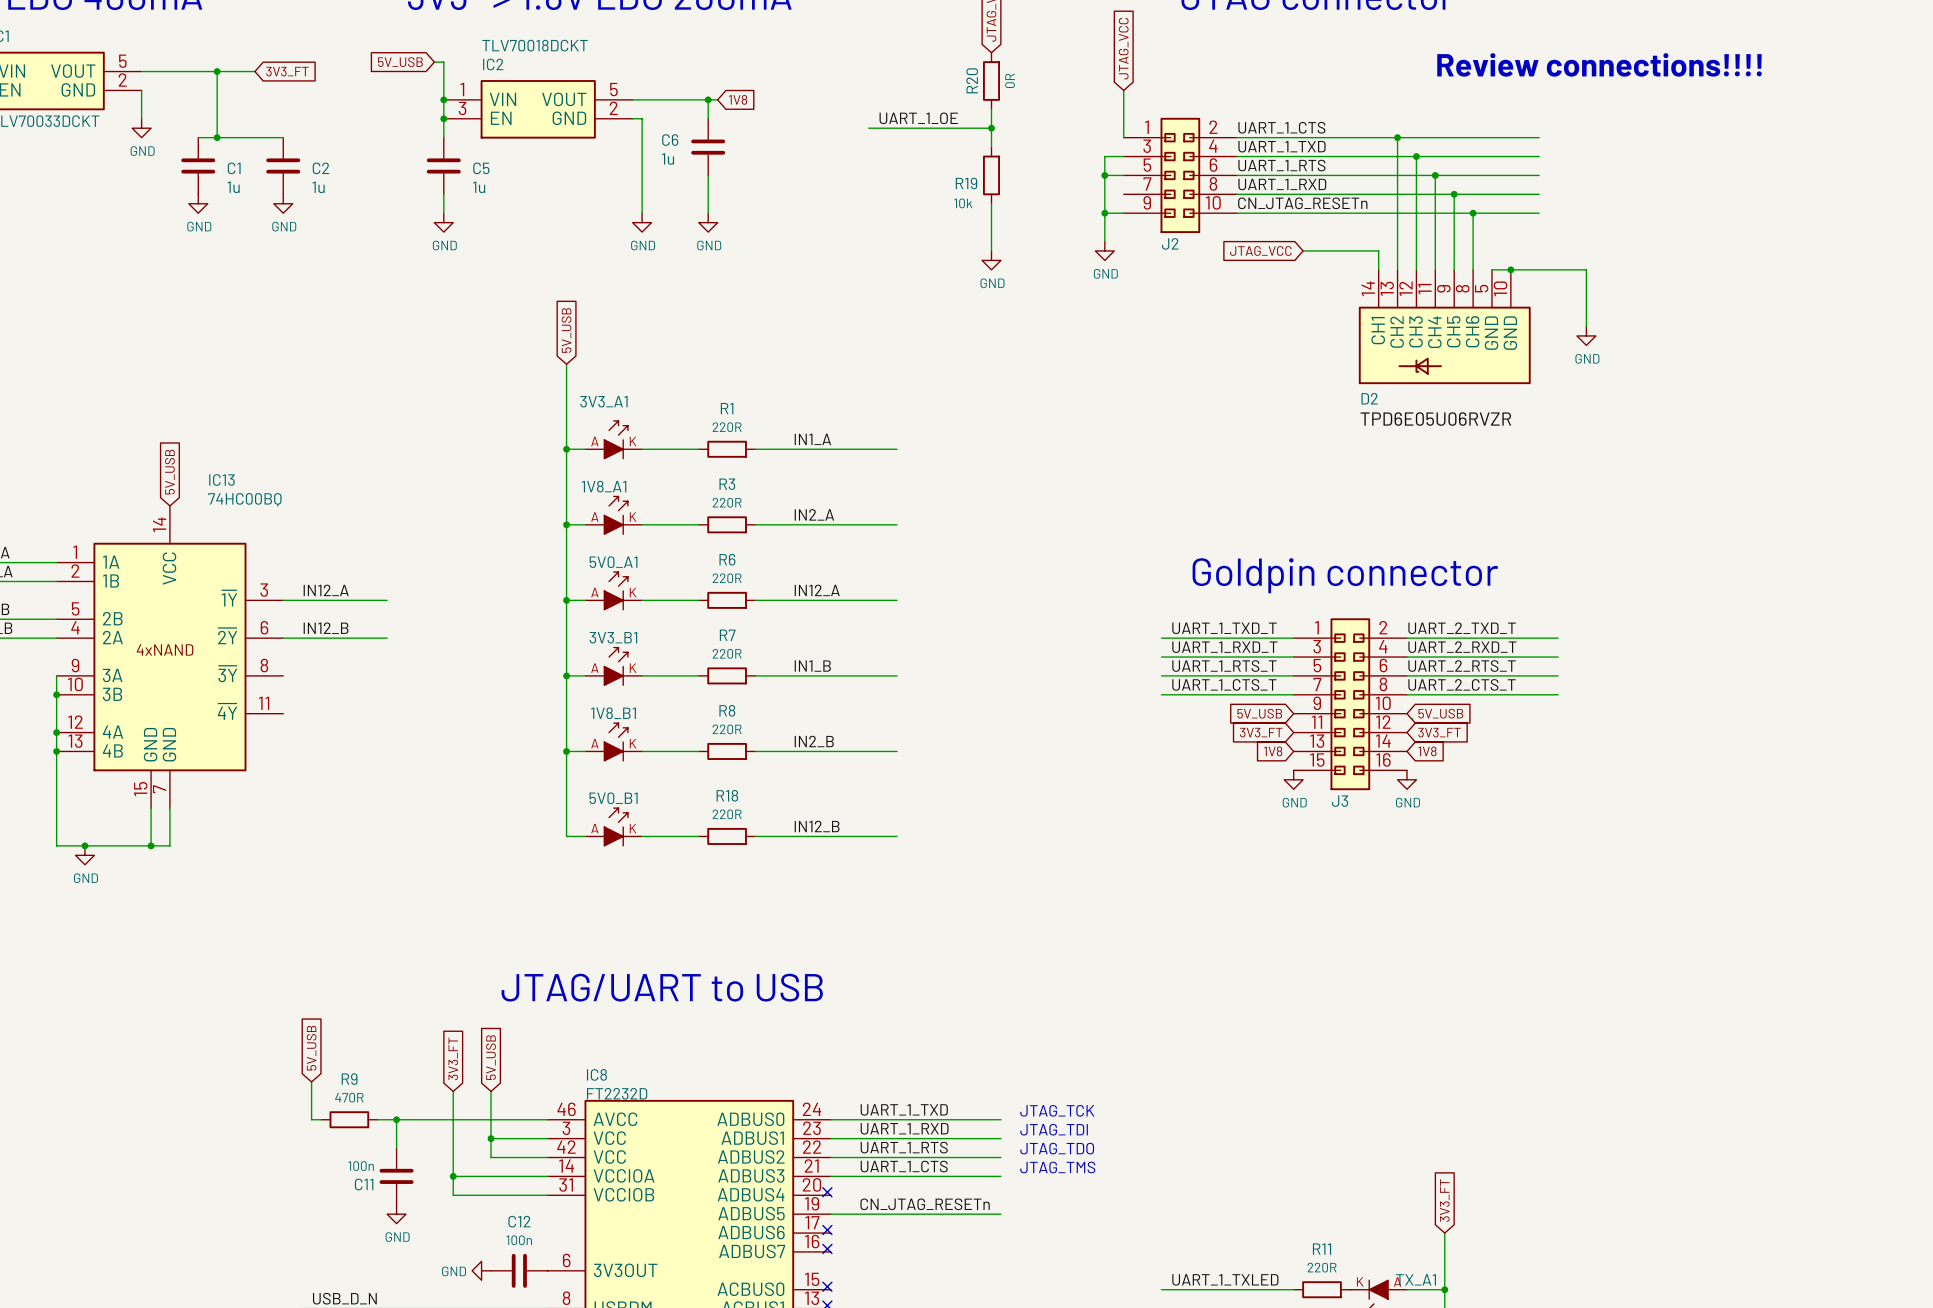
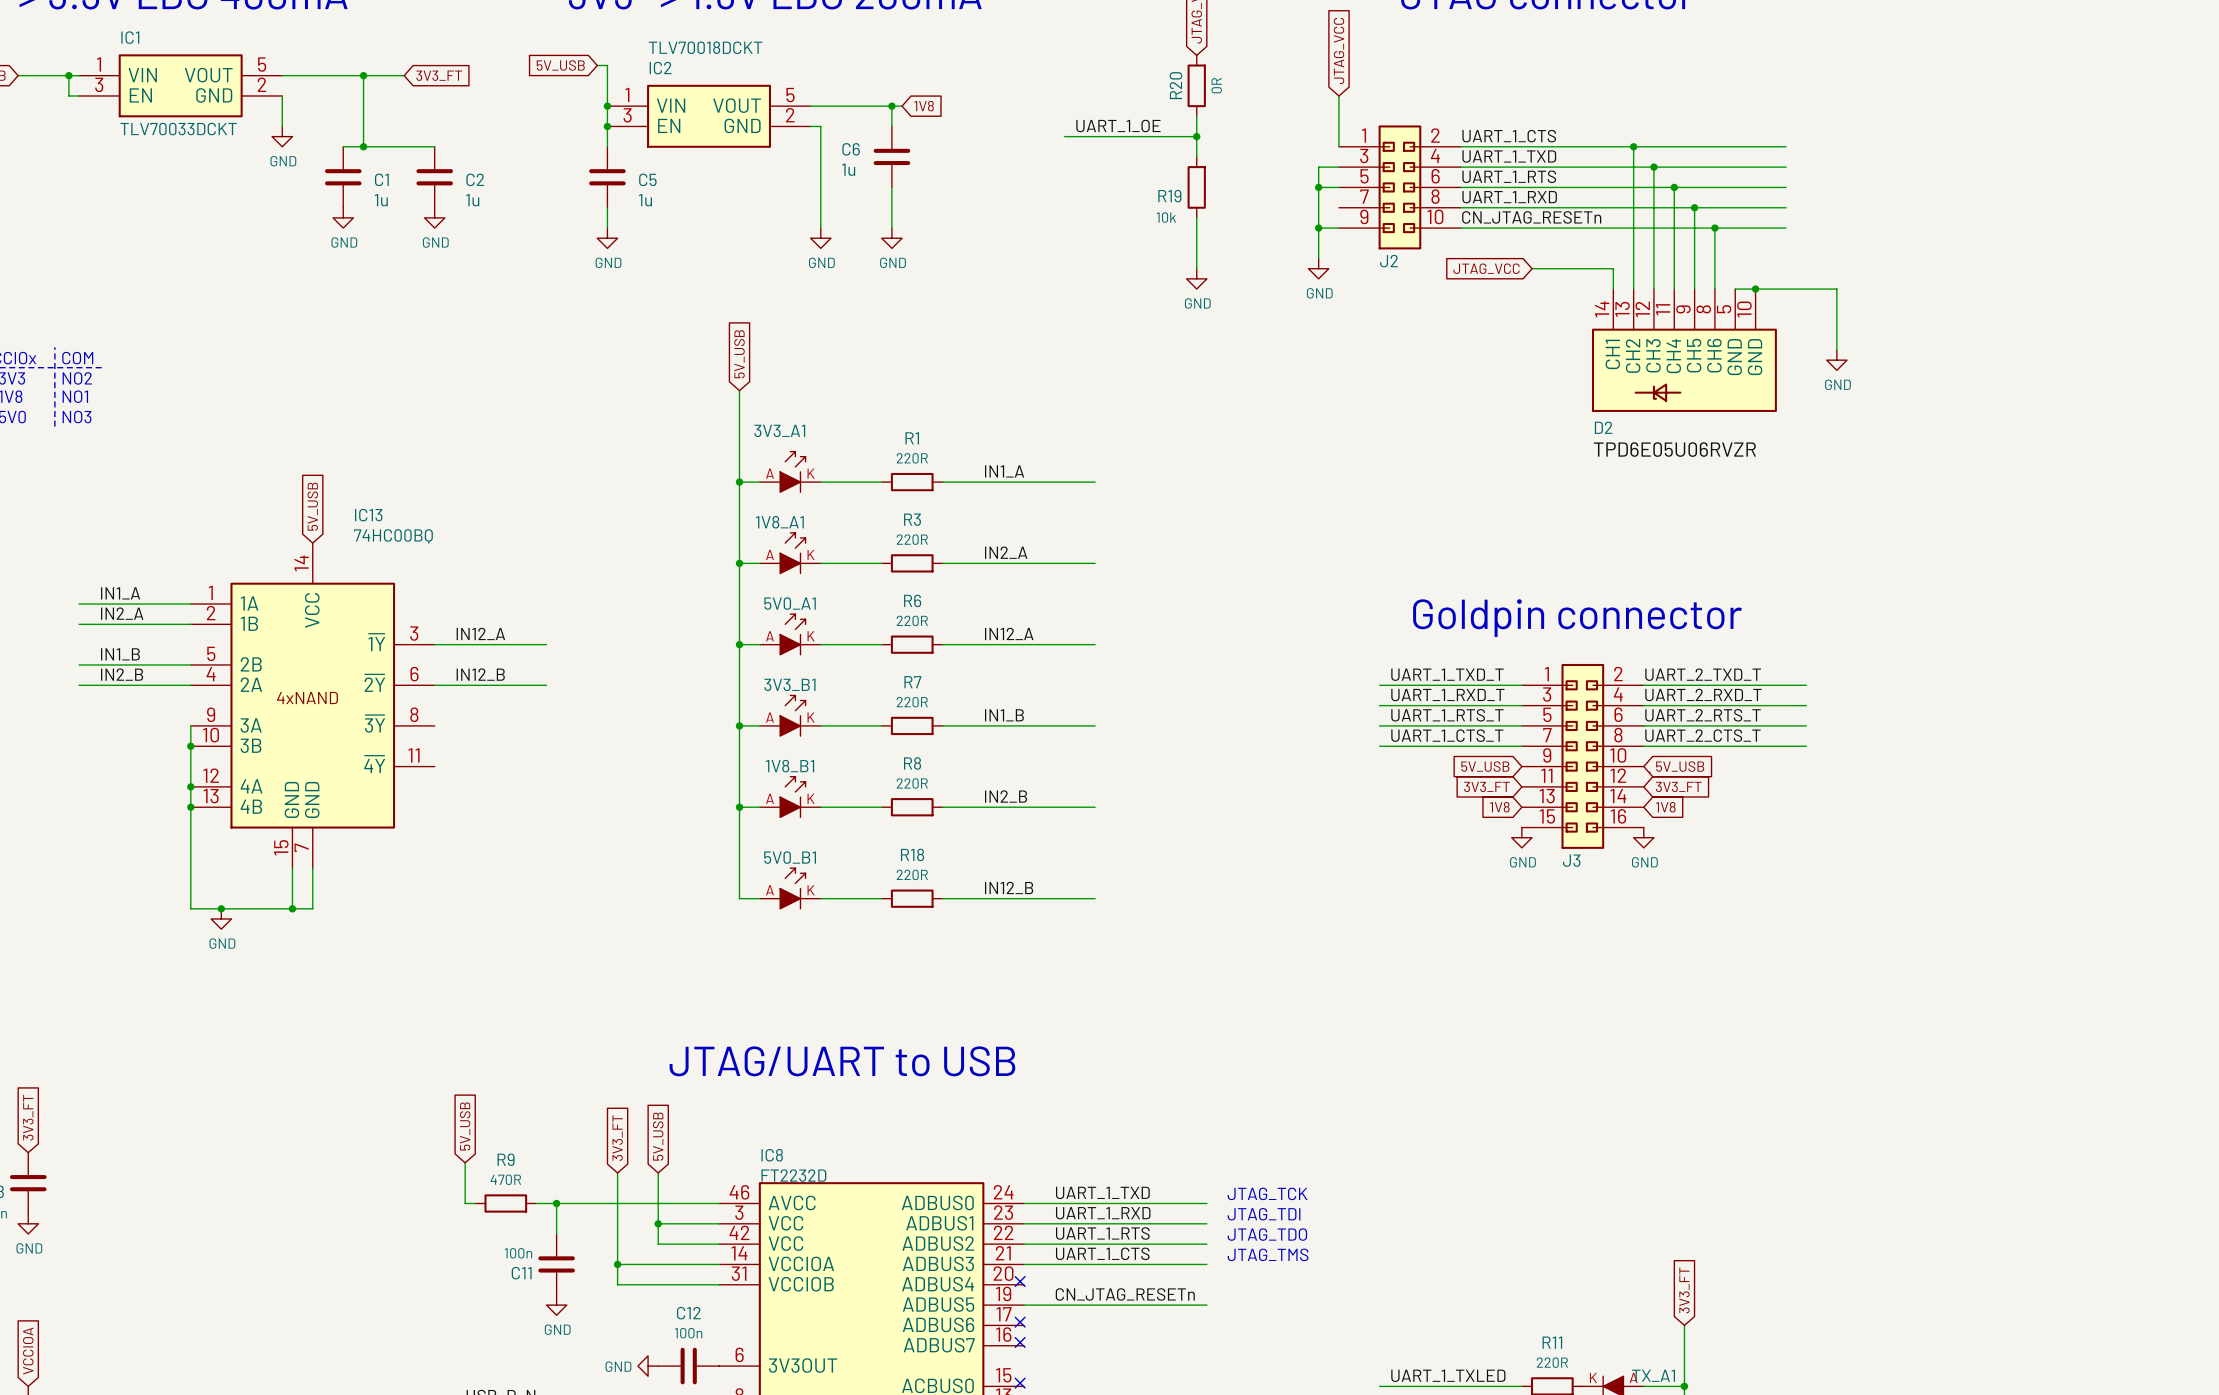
text: Review connections!!!! (1599, 64) -> none

